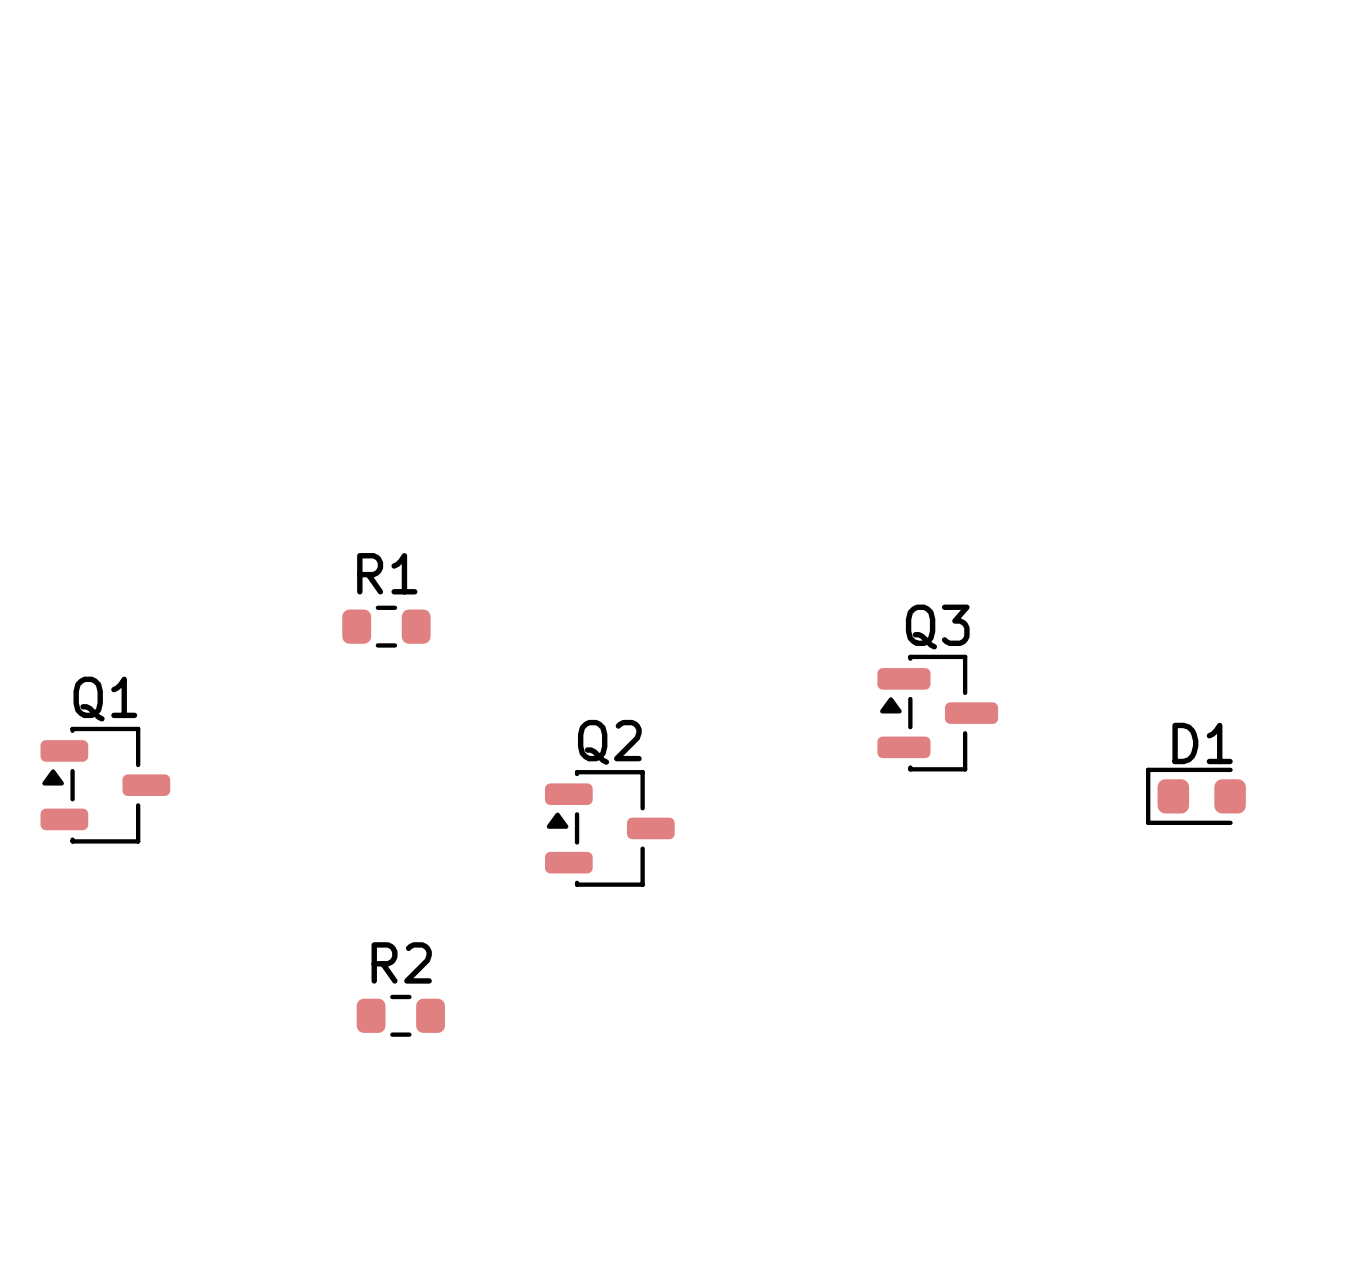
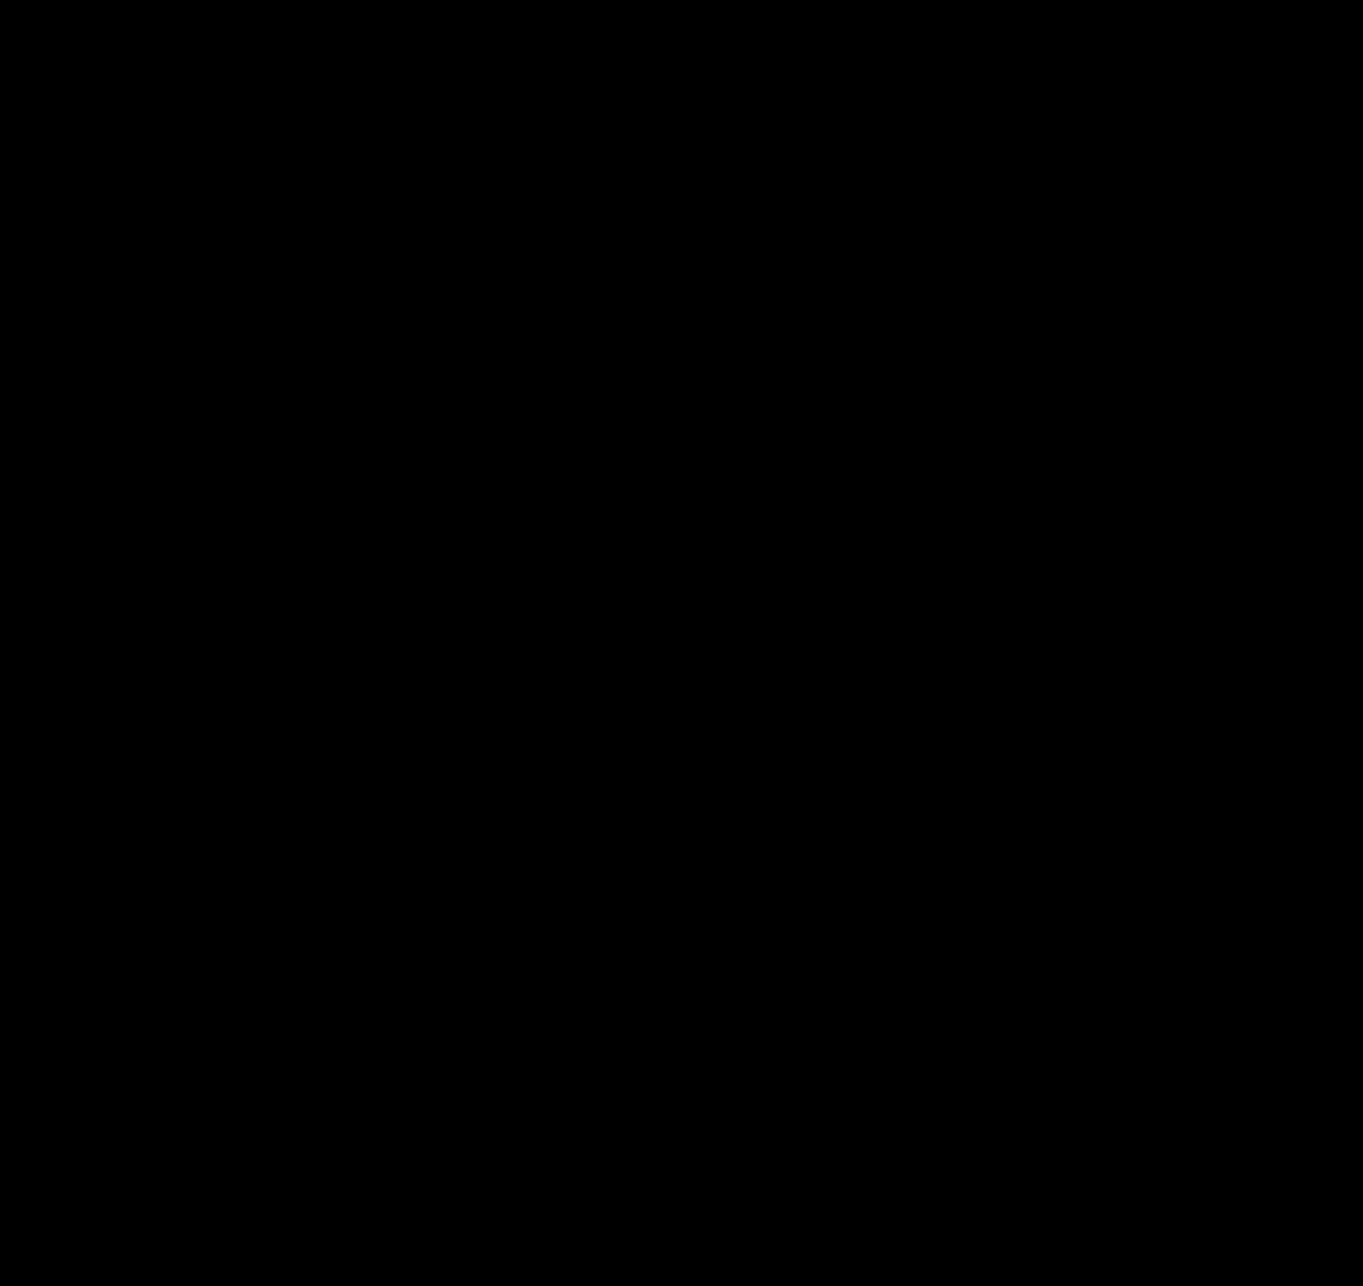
R1: (386, 626) -> none
Q3: (937, 713) -> none
Q1: (105, 785) -> none
D1: (1195, 796) -> none
Q2: (609, 828) -> none
R2: (400, 1015) -> none

